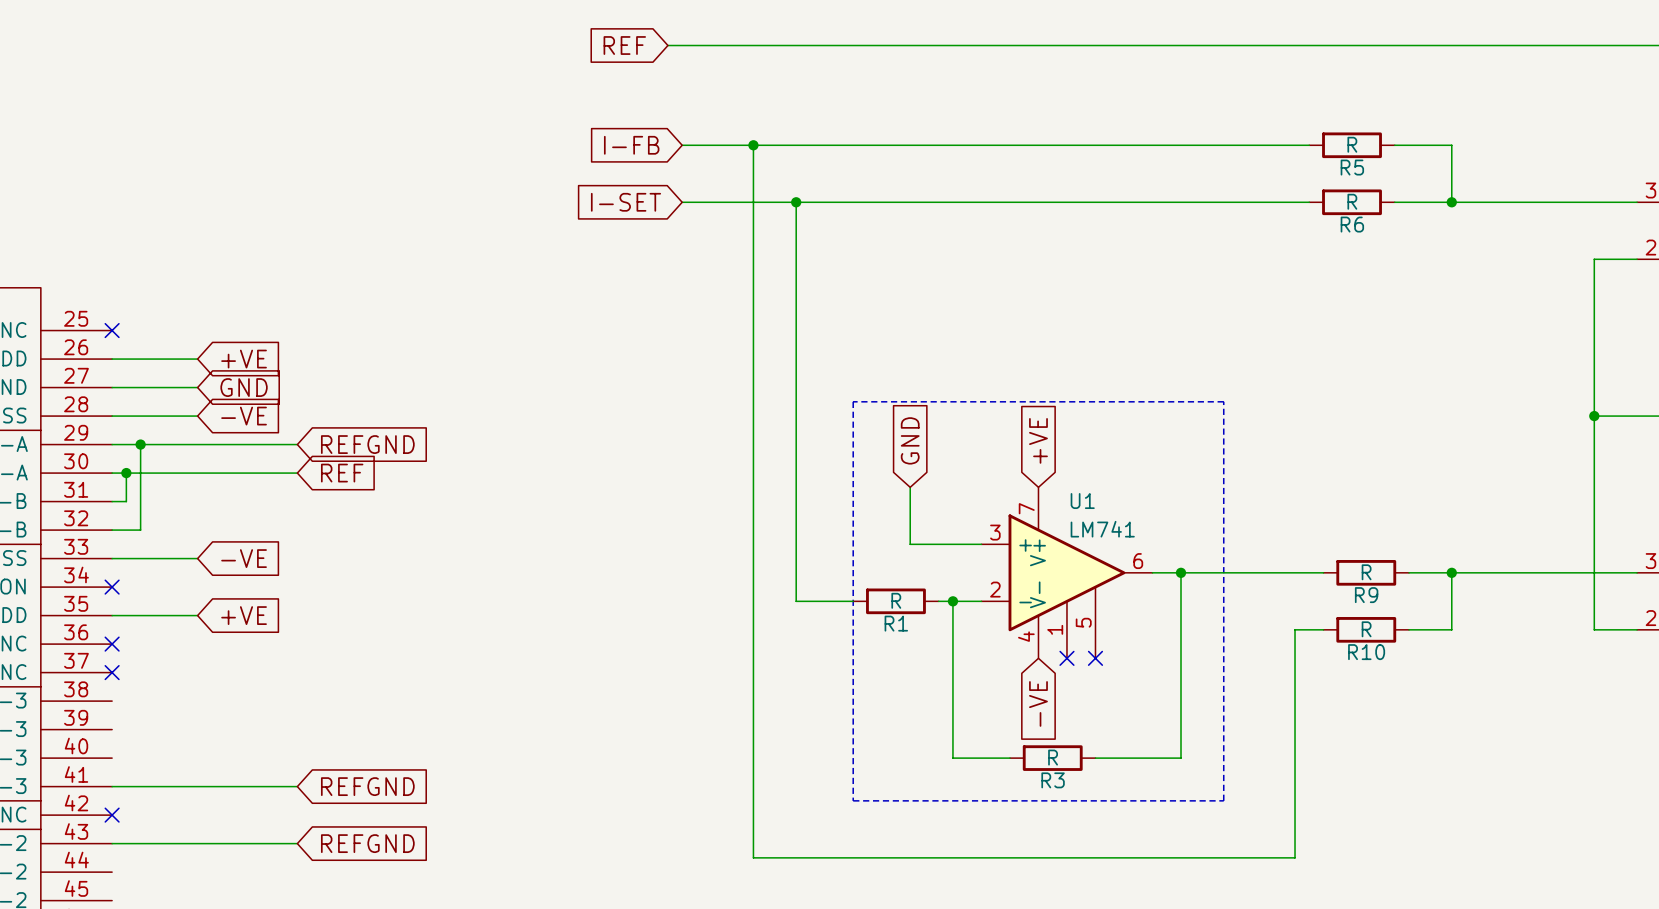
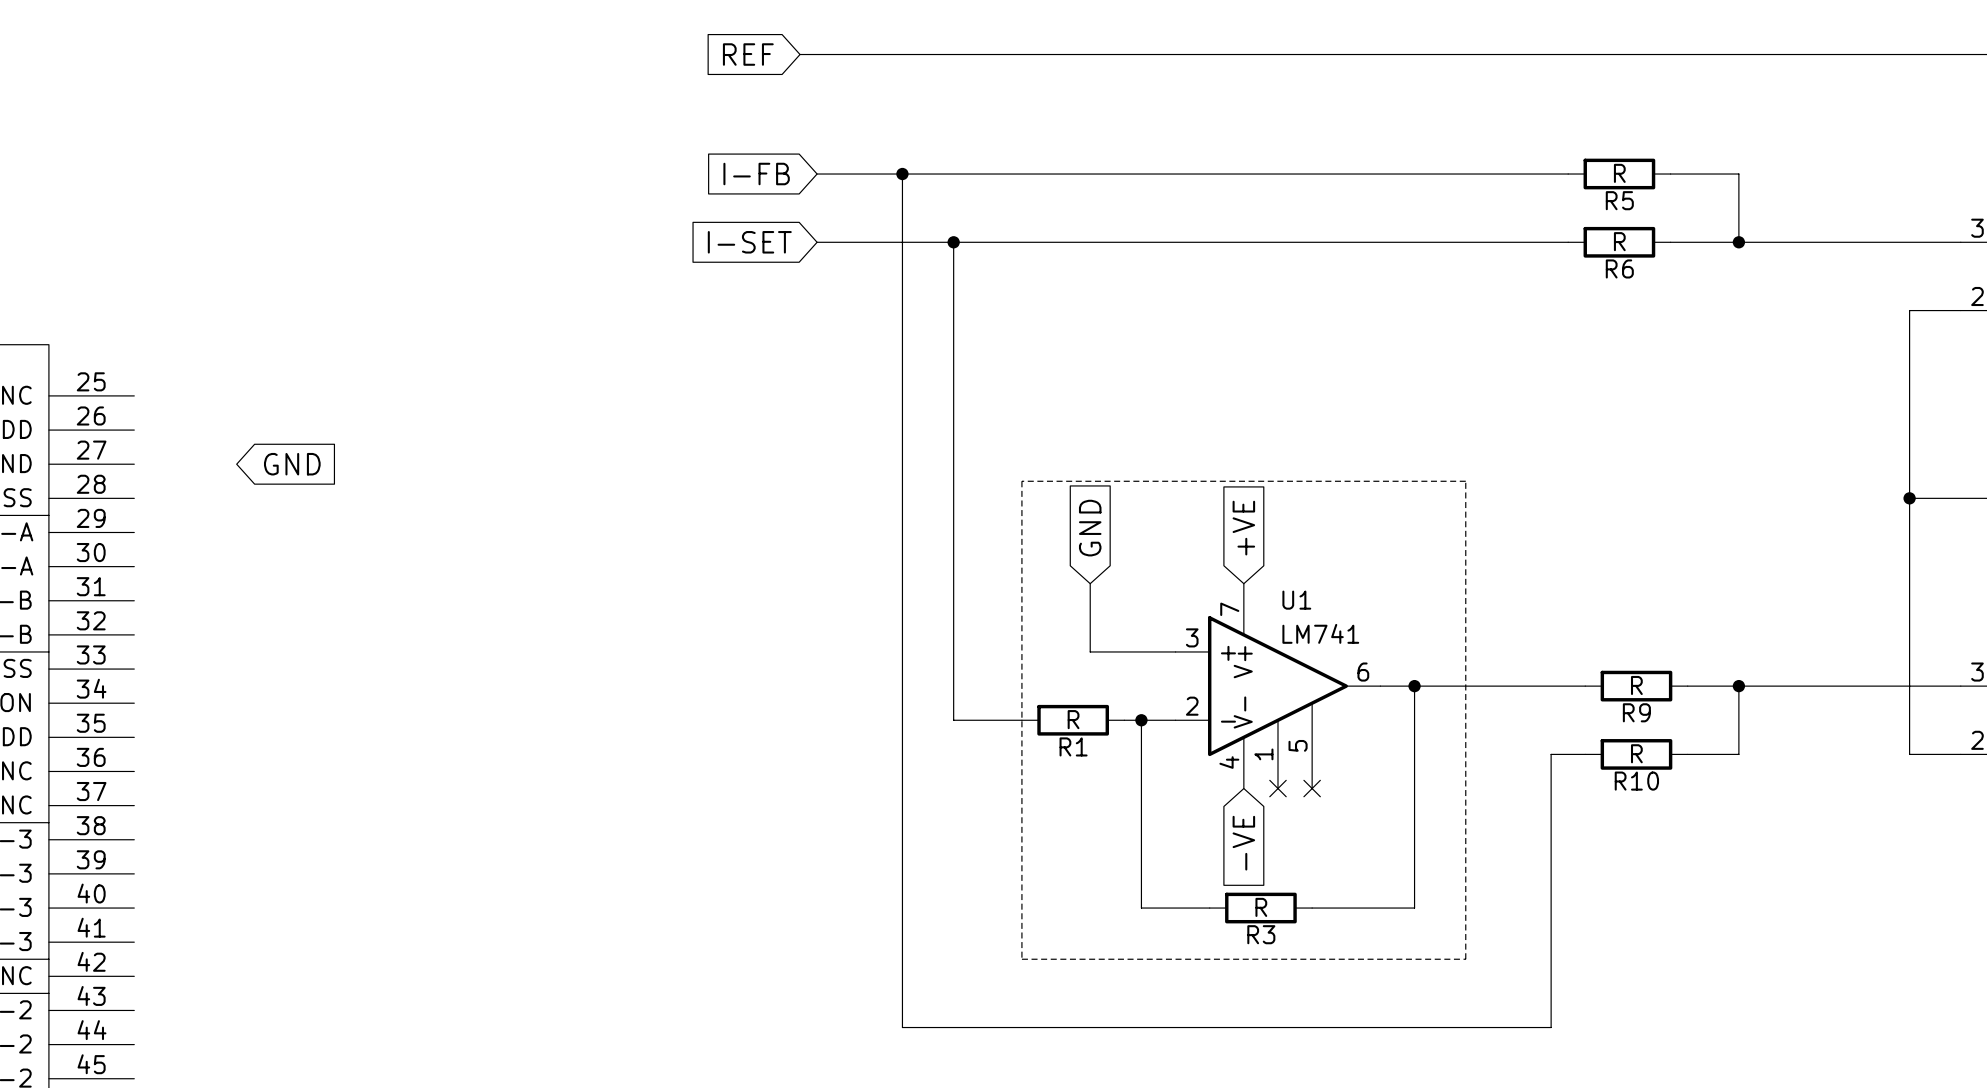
no-connect mark: (112, 330) -> none
wire: (112, 359) (197, 359) -> none
global label: +VE (244, 359) -> none
wire: (112, 387) (197, 387) -> none
wire: (112, 416) (197, 416) -> none
global label: -VE (244, 416) -> none
wire: (112, 444) (297, 444) -> none
wire: (140, 444) (140, 530) (112, 530) -> none
junction: (140, 444) -> none
global label: REFGND (367, 444) -> none
wire: (112, 473) (297, 473) -> none
wire: (126, 473) (126, 501) (112, 501) -> none
junction: (126, 473) -> none
global label: REF (342, 473) -> none
wire: (112, 558) (197, 558) -> none
global label: -VE (244, 558) -> none
no-connect mark: (112, 587) -> none
wire: (112, 615) (197, 615) -> none
global label: +VE (244, 615) -> none
no-connect mark: (112, 644) -> none
no-connect mark: (112, 672) -> none
wire: (112, 786) (297, 786) -> none
global label: REFGND (367, 786) -> none
no-connect mark: (112, 815) -> none
wire: (112, 843) (297, 843) -> none
global label: REFGND (367, 843) -> none

